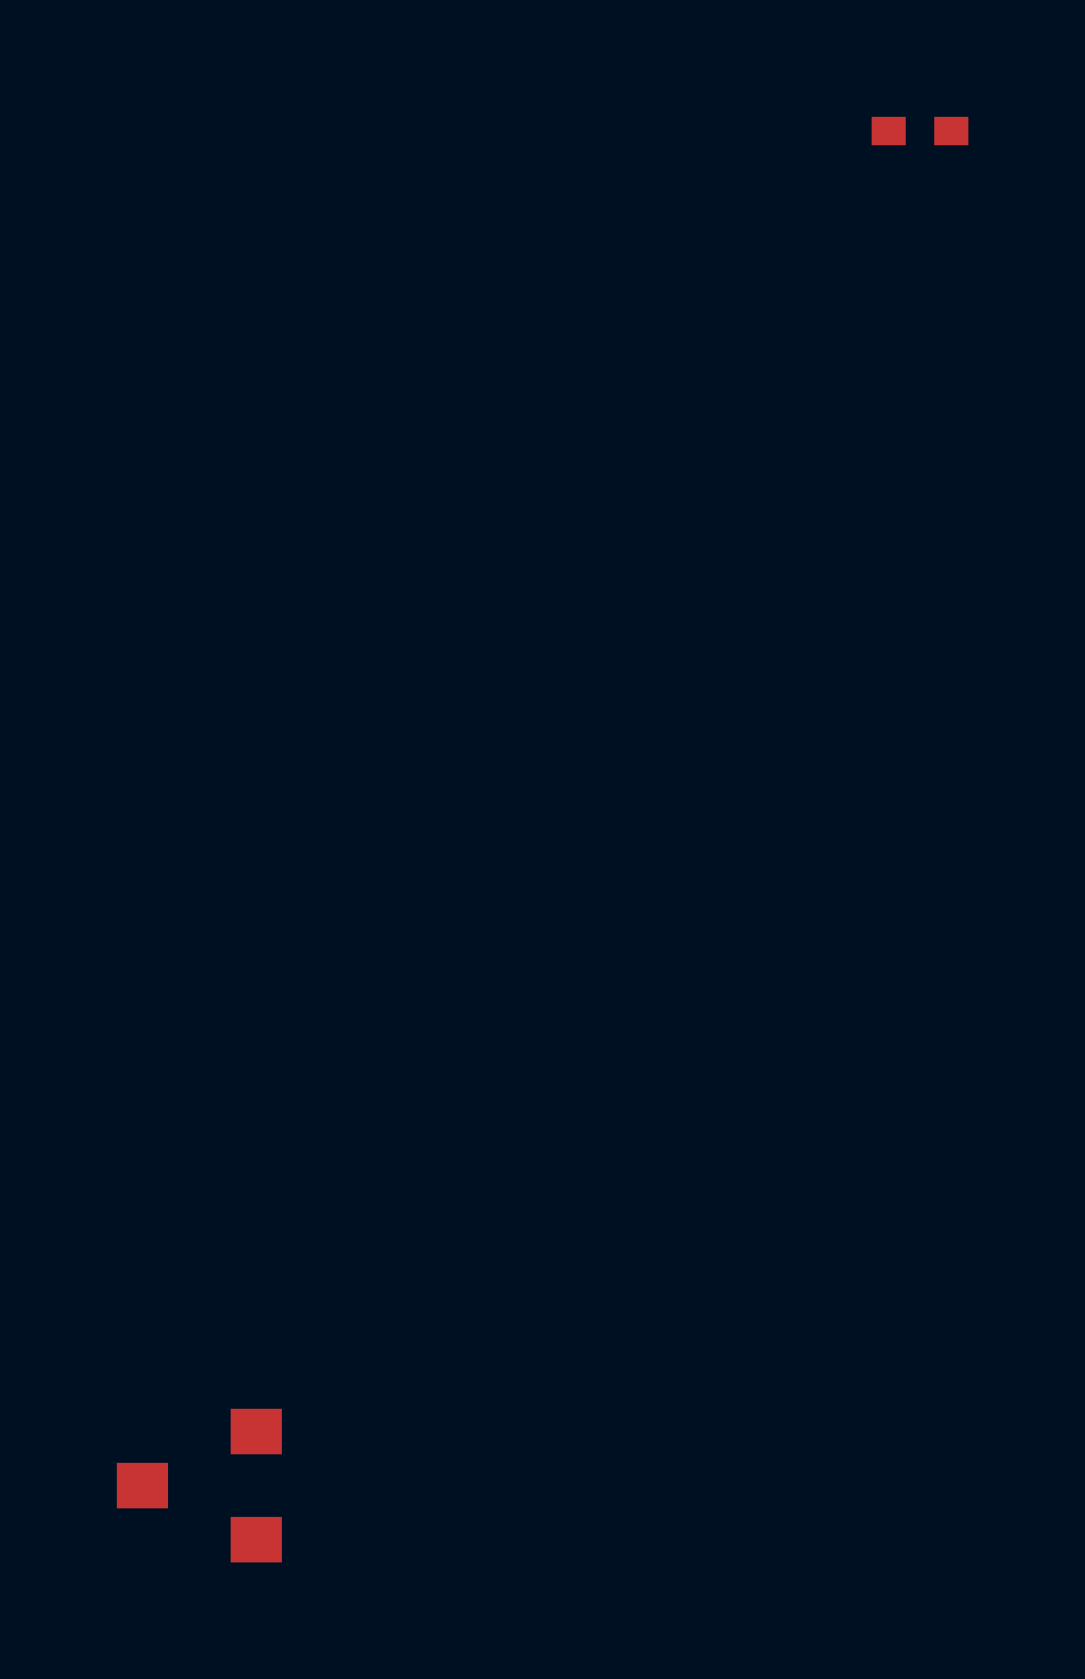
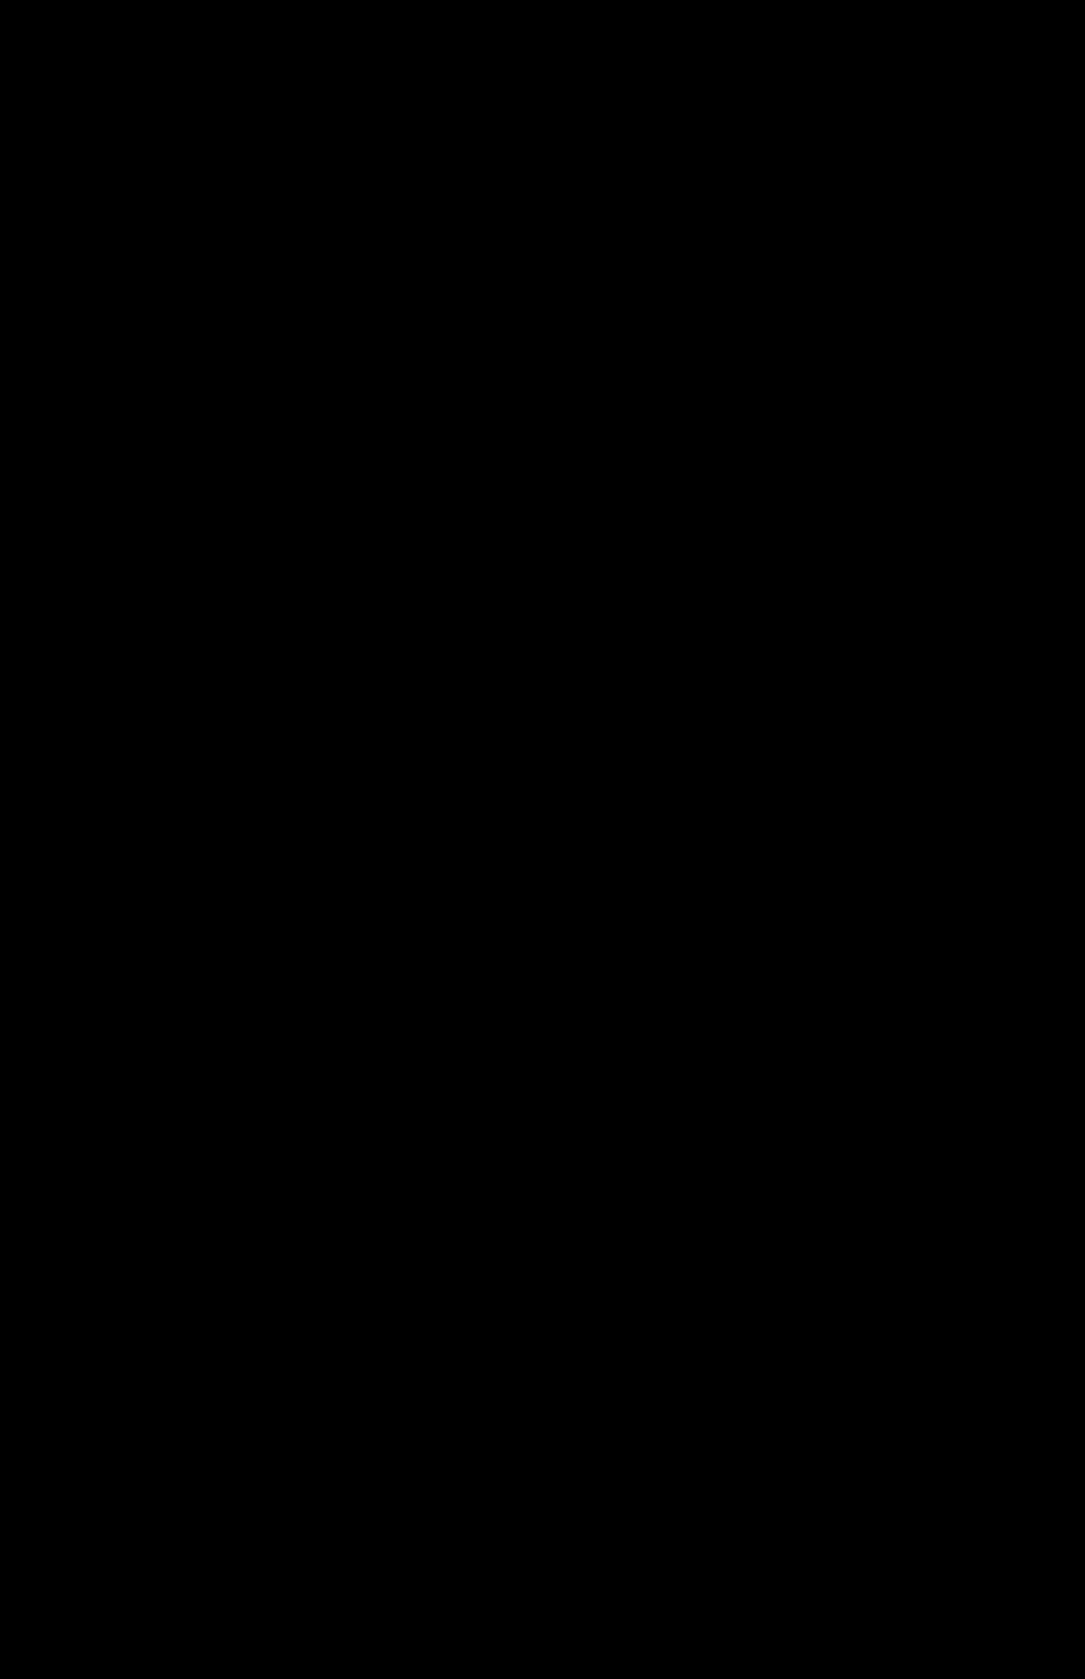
part: (919, 131) -> none
part: (199, 1485) -> none

